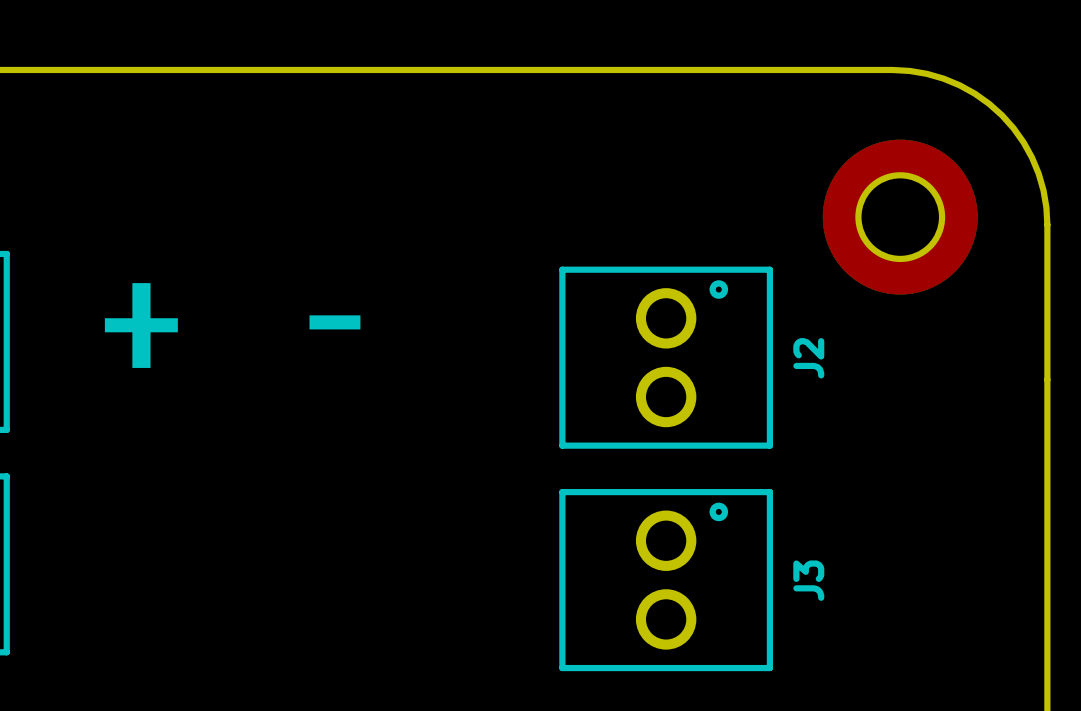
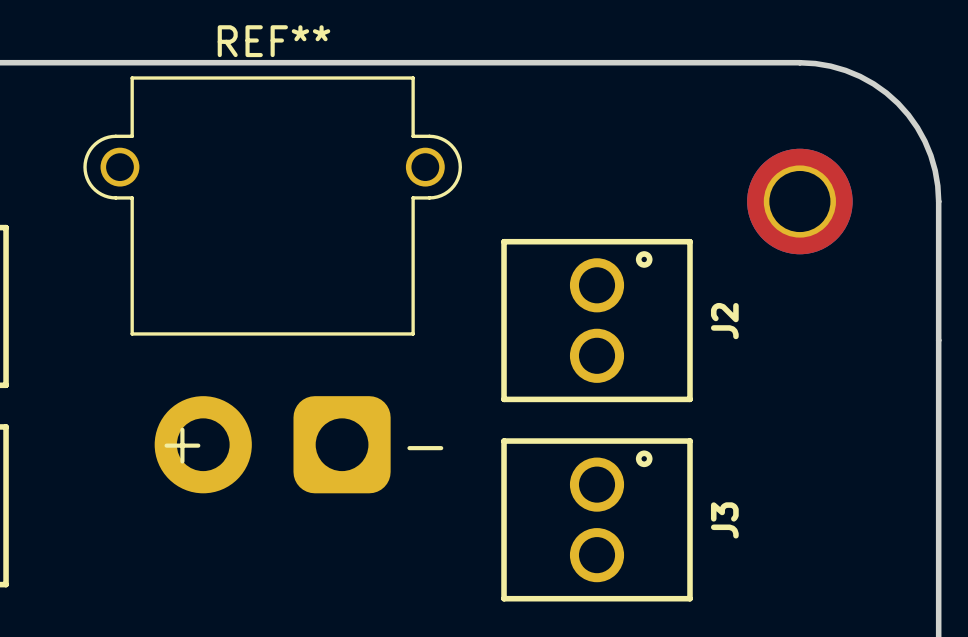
part footprint: [822, 139, 978, 295] -> [747, 148, 853, 255]
drawing: [104, 283, 178, 368] -> none
drawing: [309, 315, 361, 330] -> none
REF**: none -> (272, 284)

